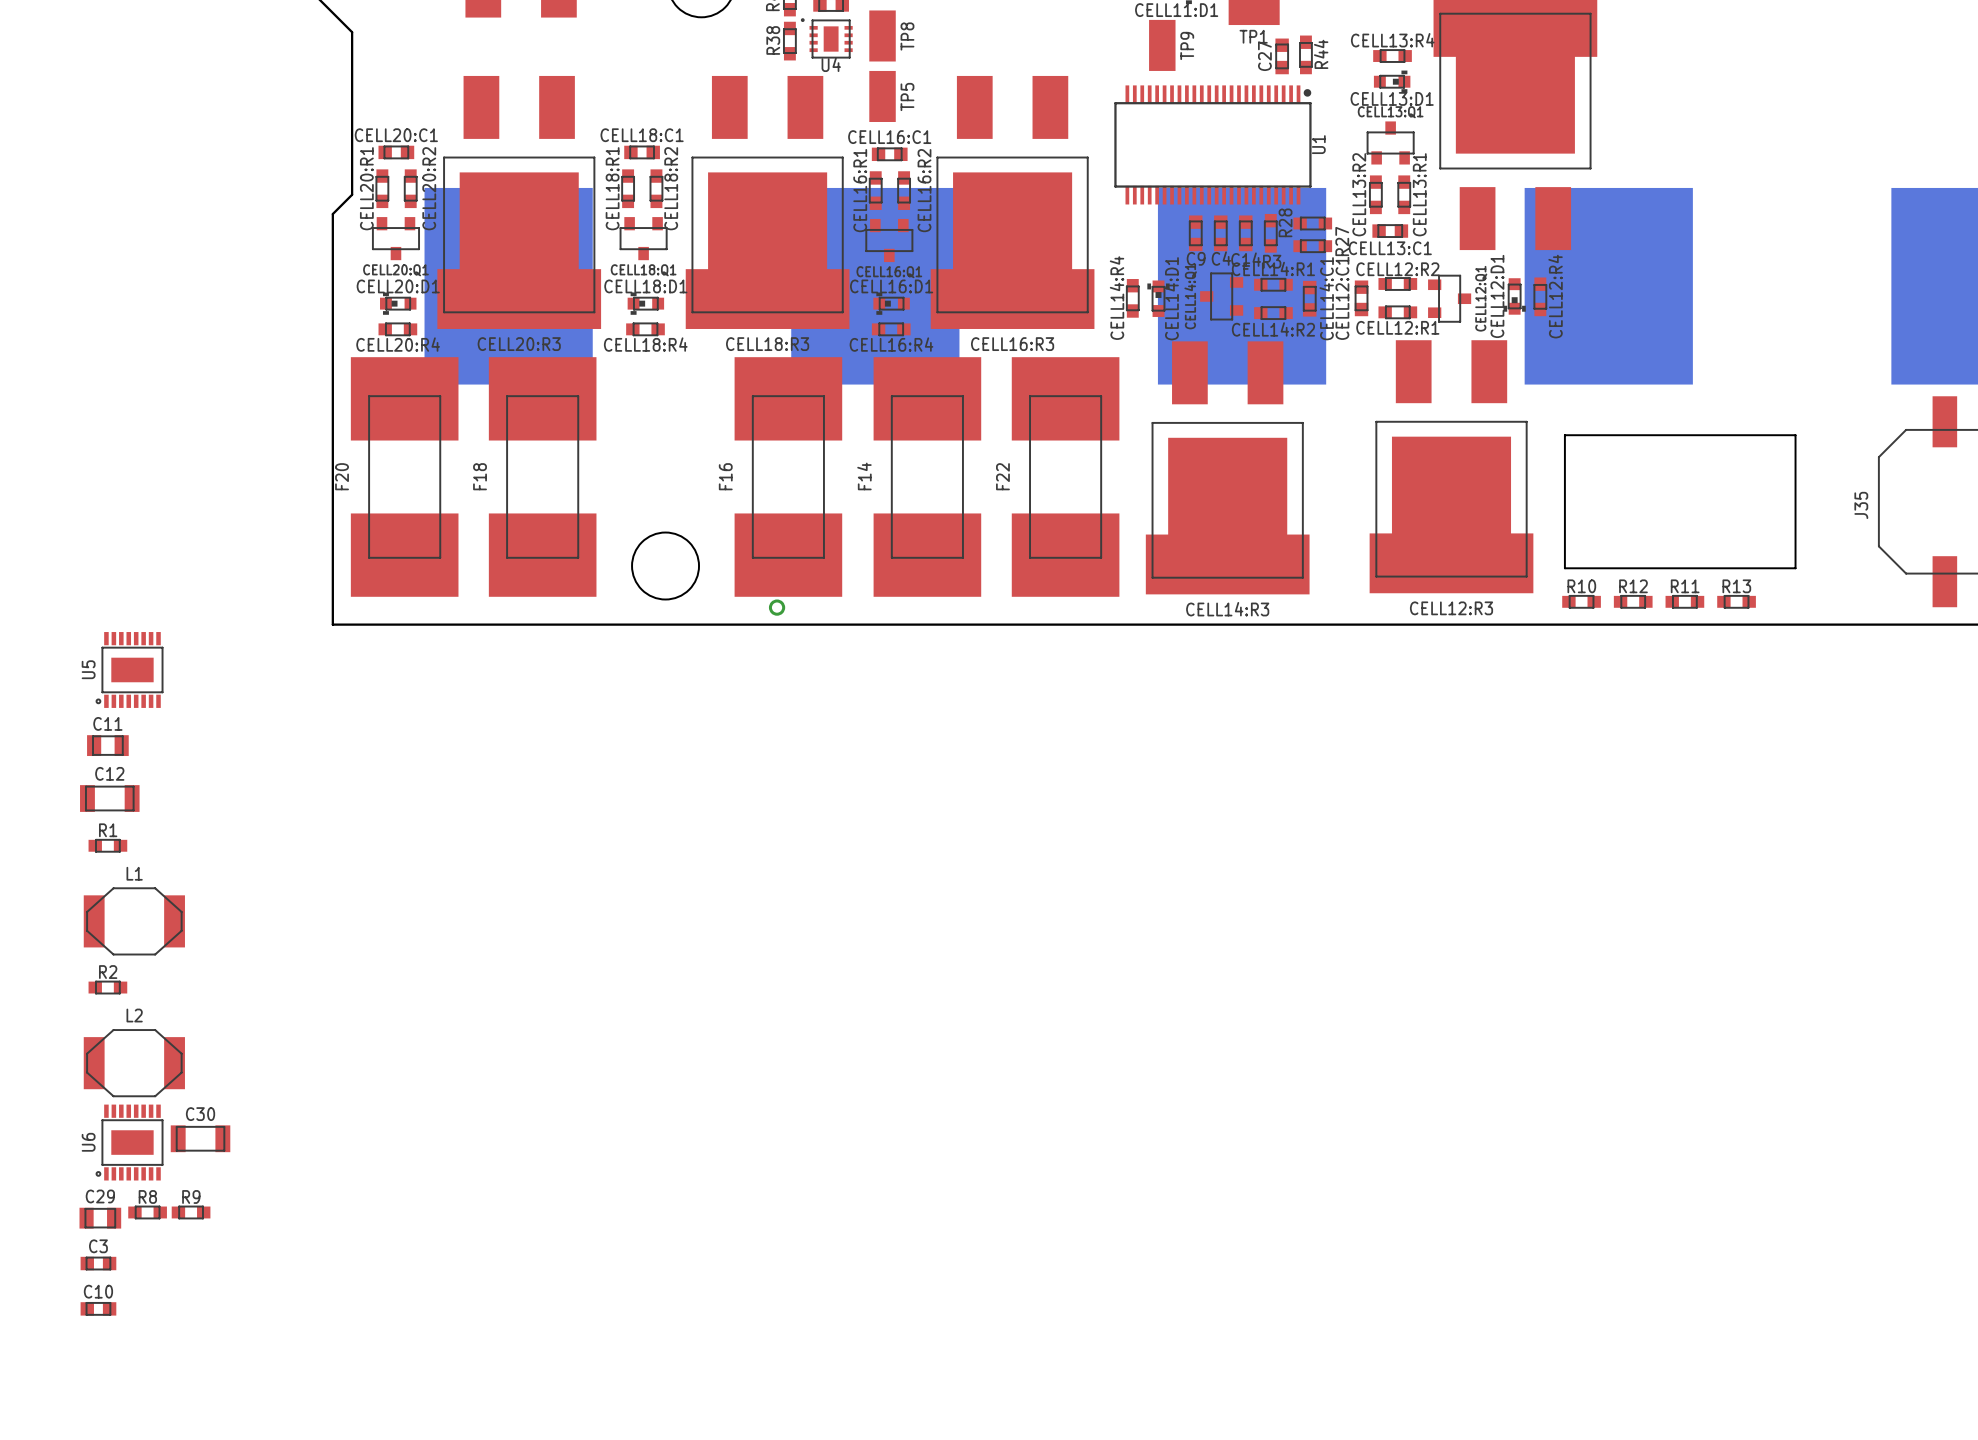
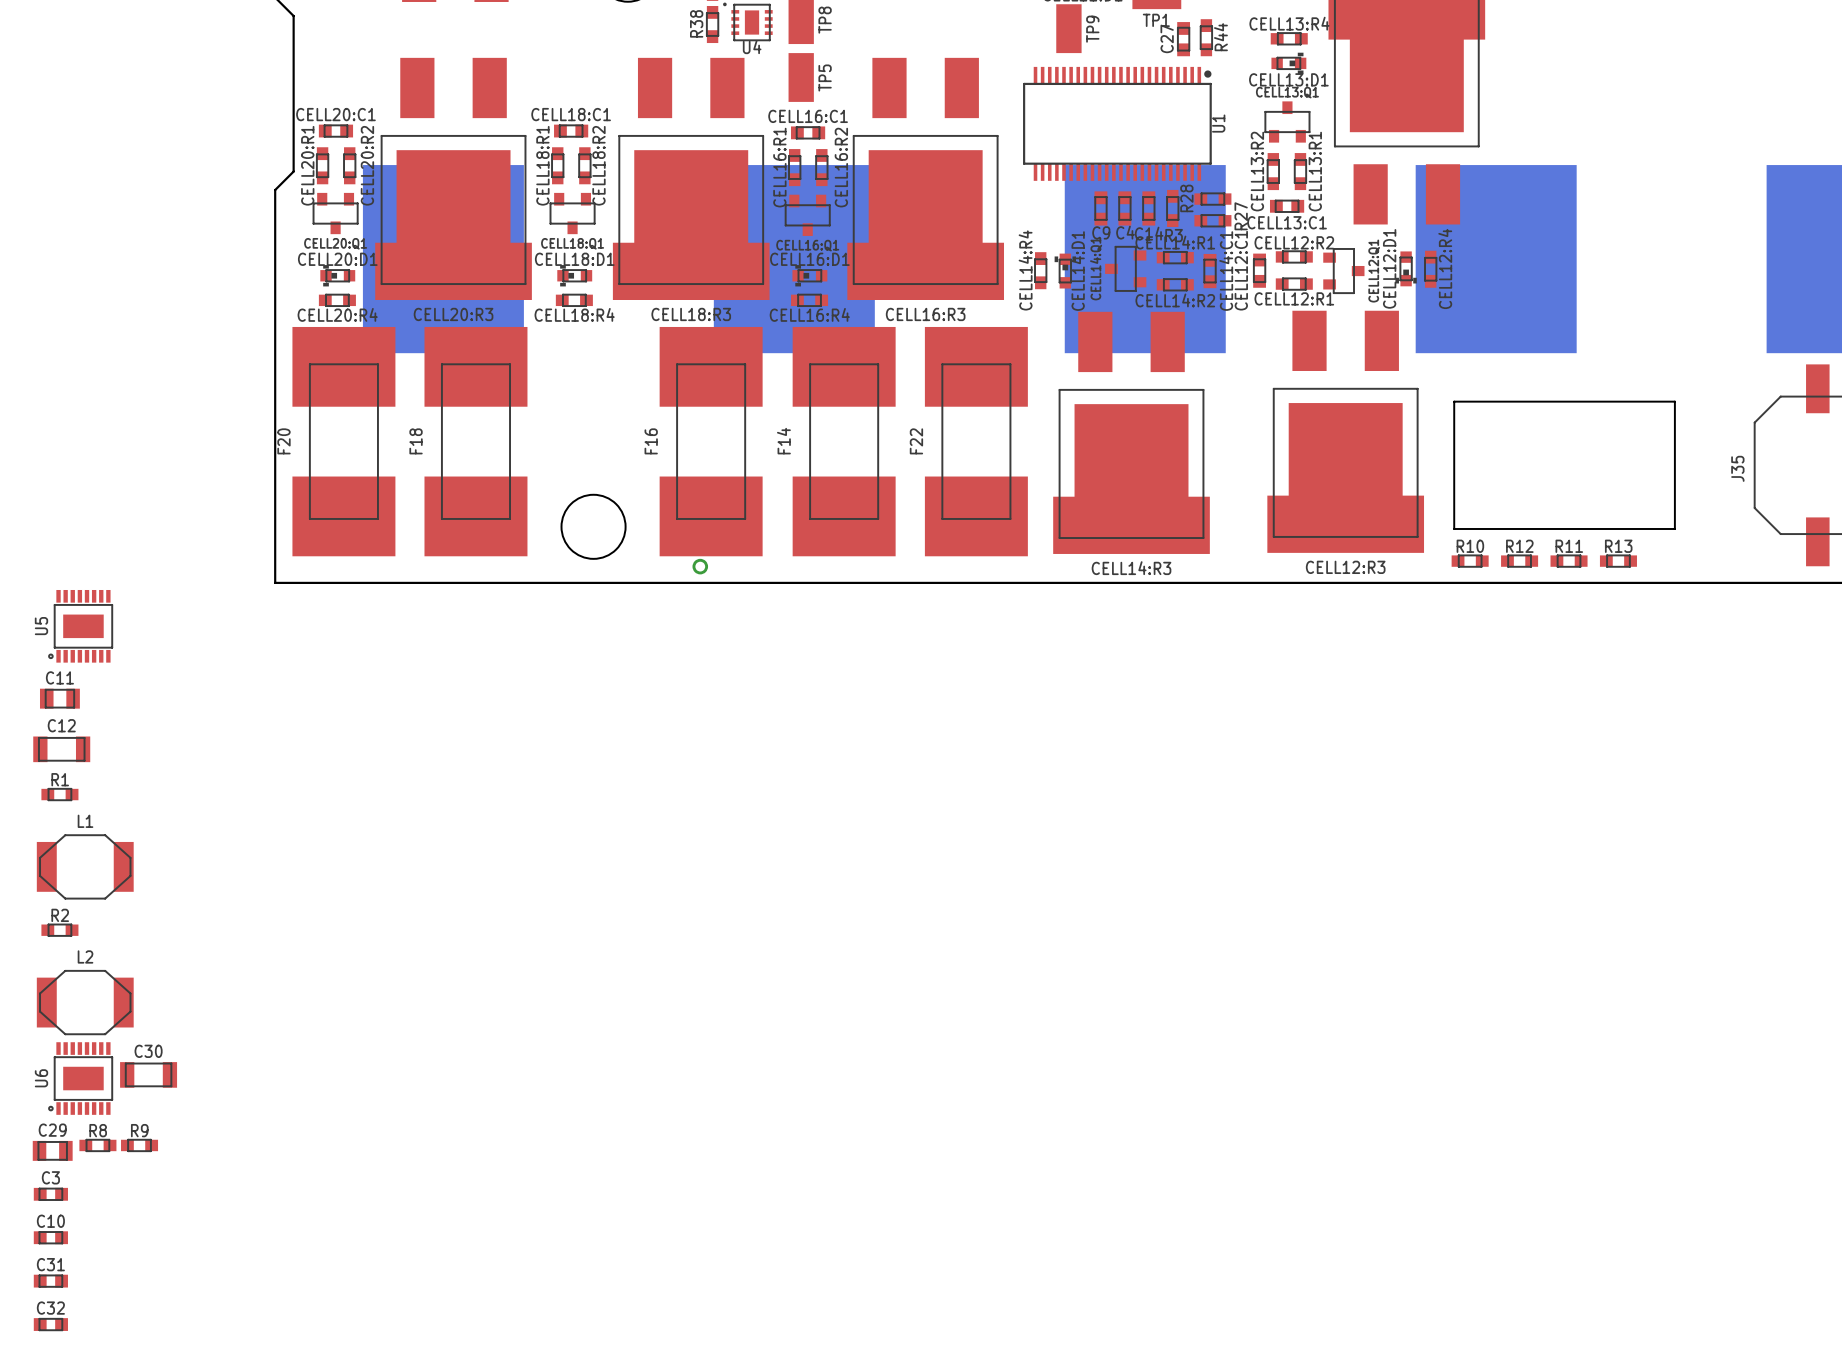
C31: none -> (50, 1281)
C32: none -> (50, 1324)

